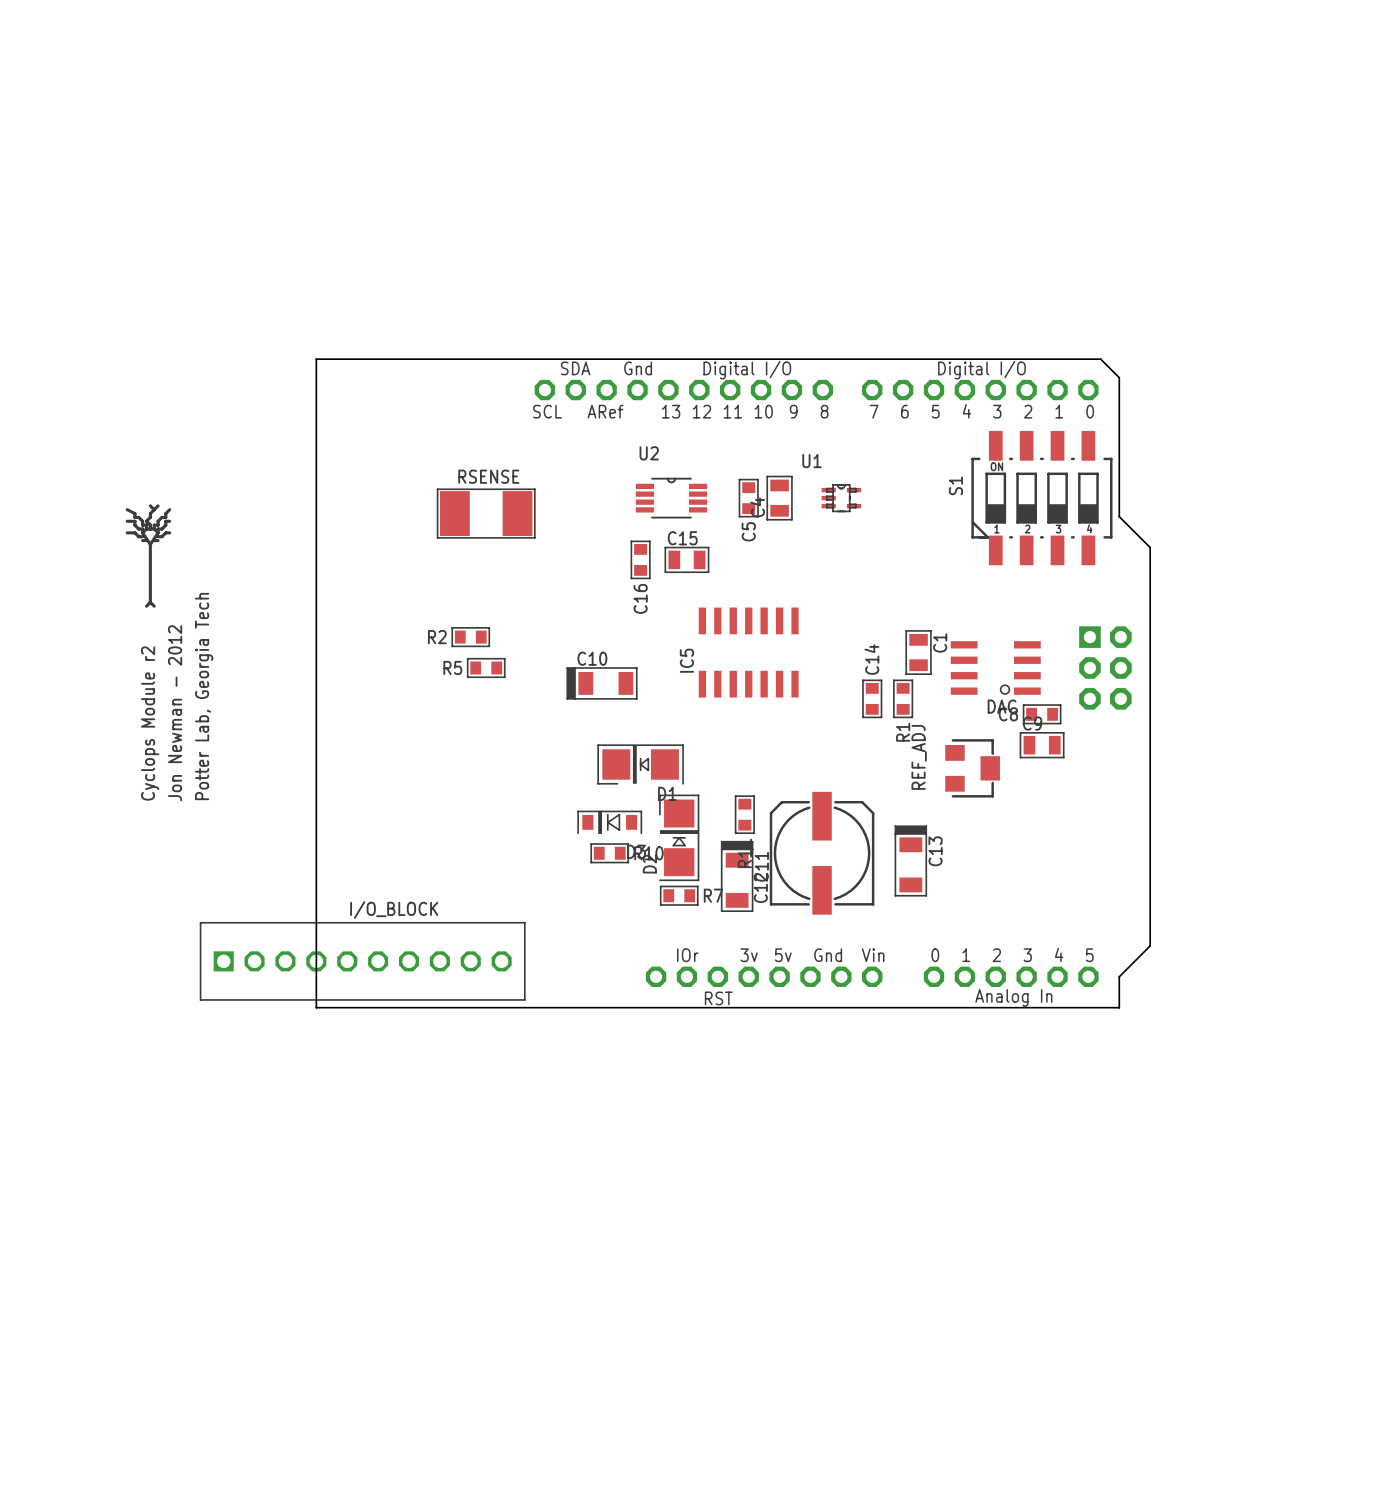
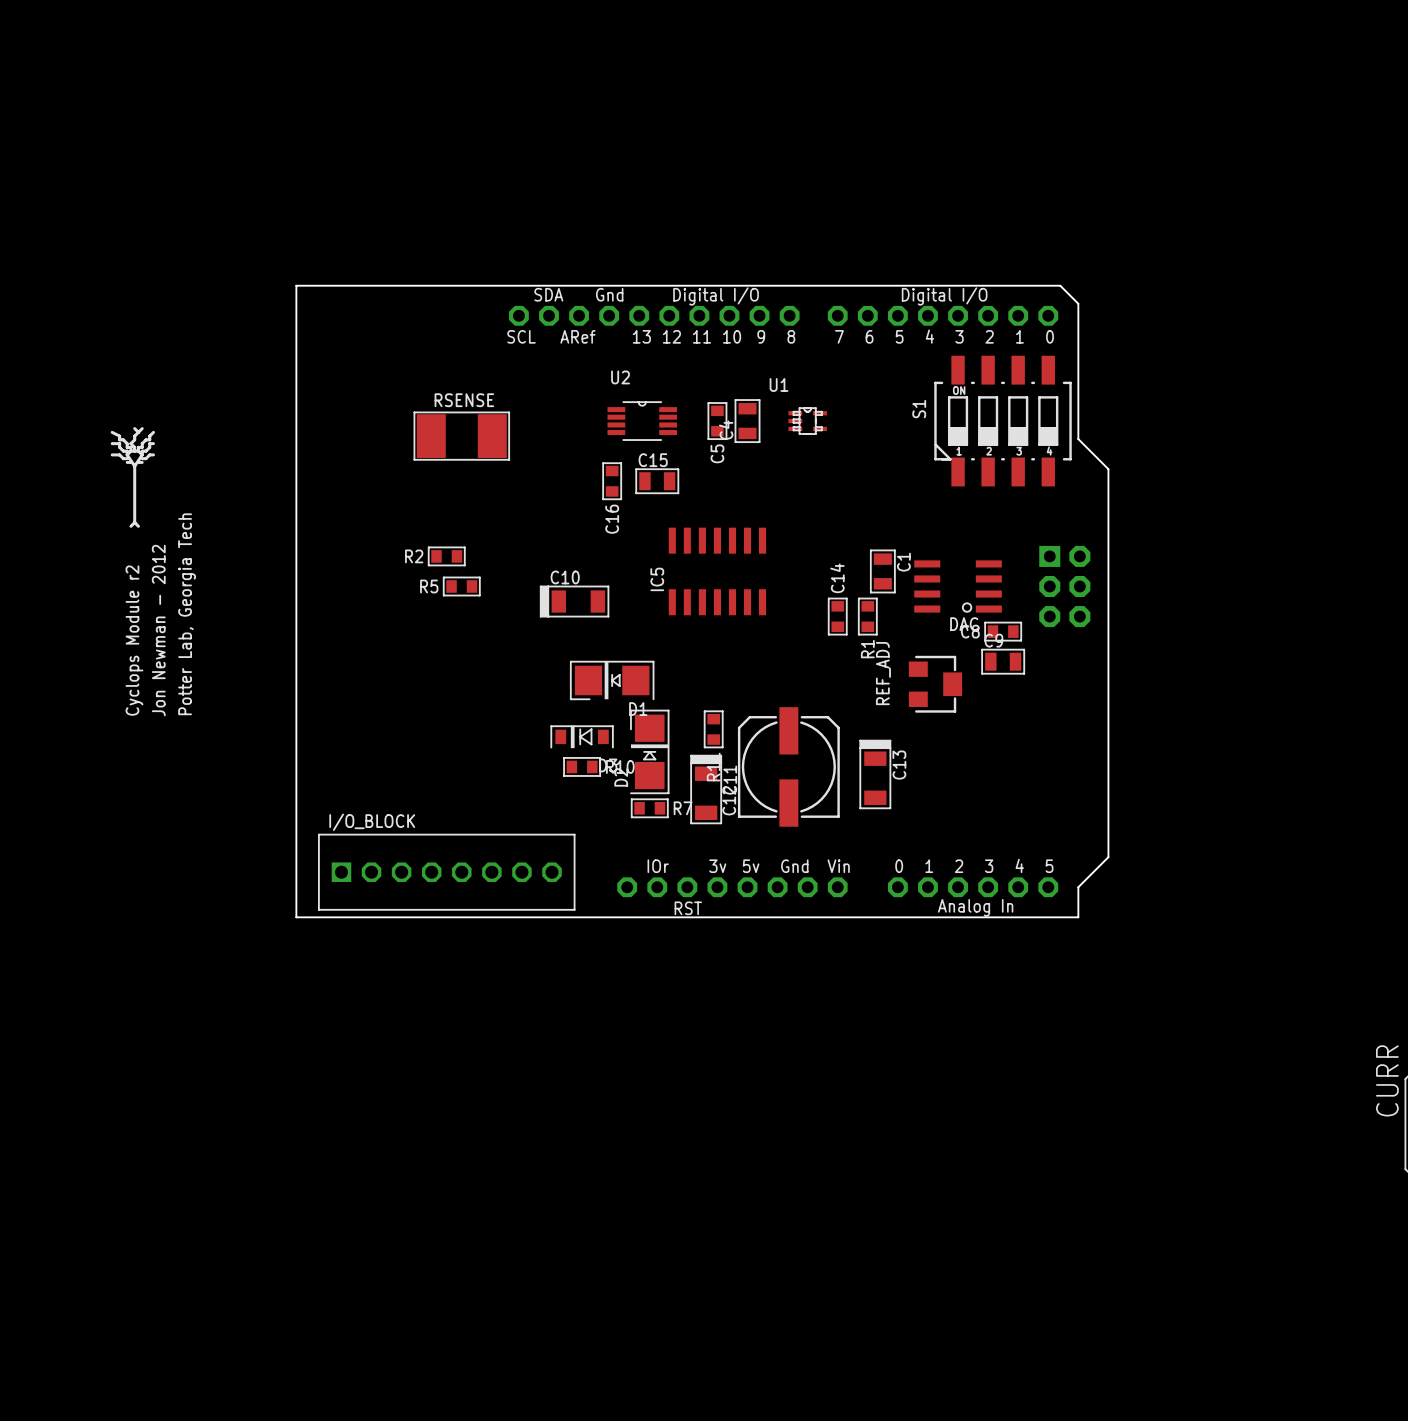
I/O_BLOCK: (362, 961) -> none
I/O_BLOCK: none -> (446, 872)

